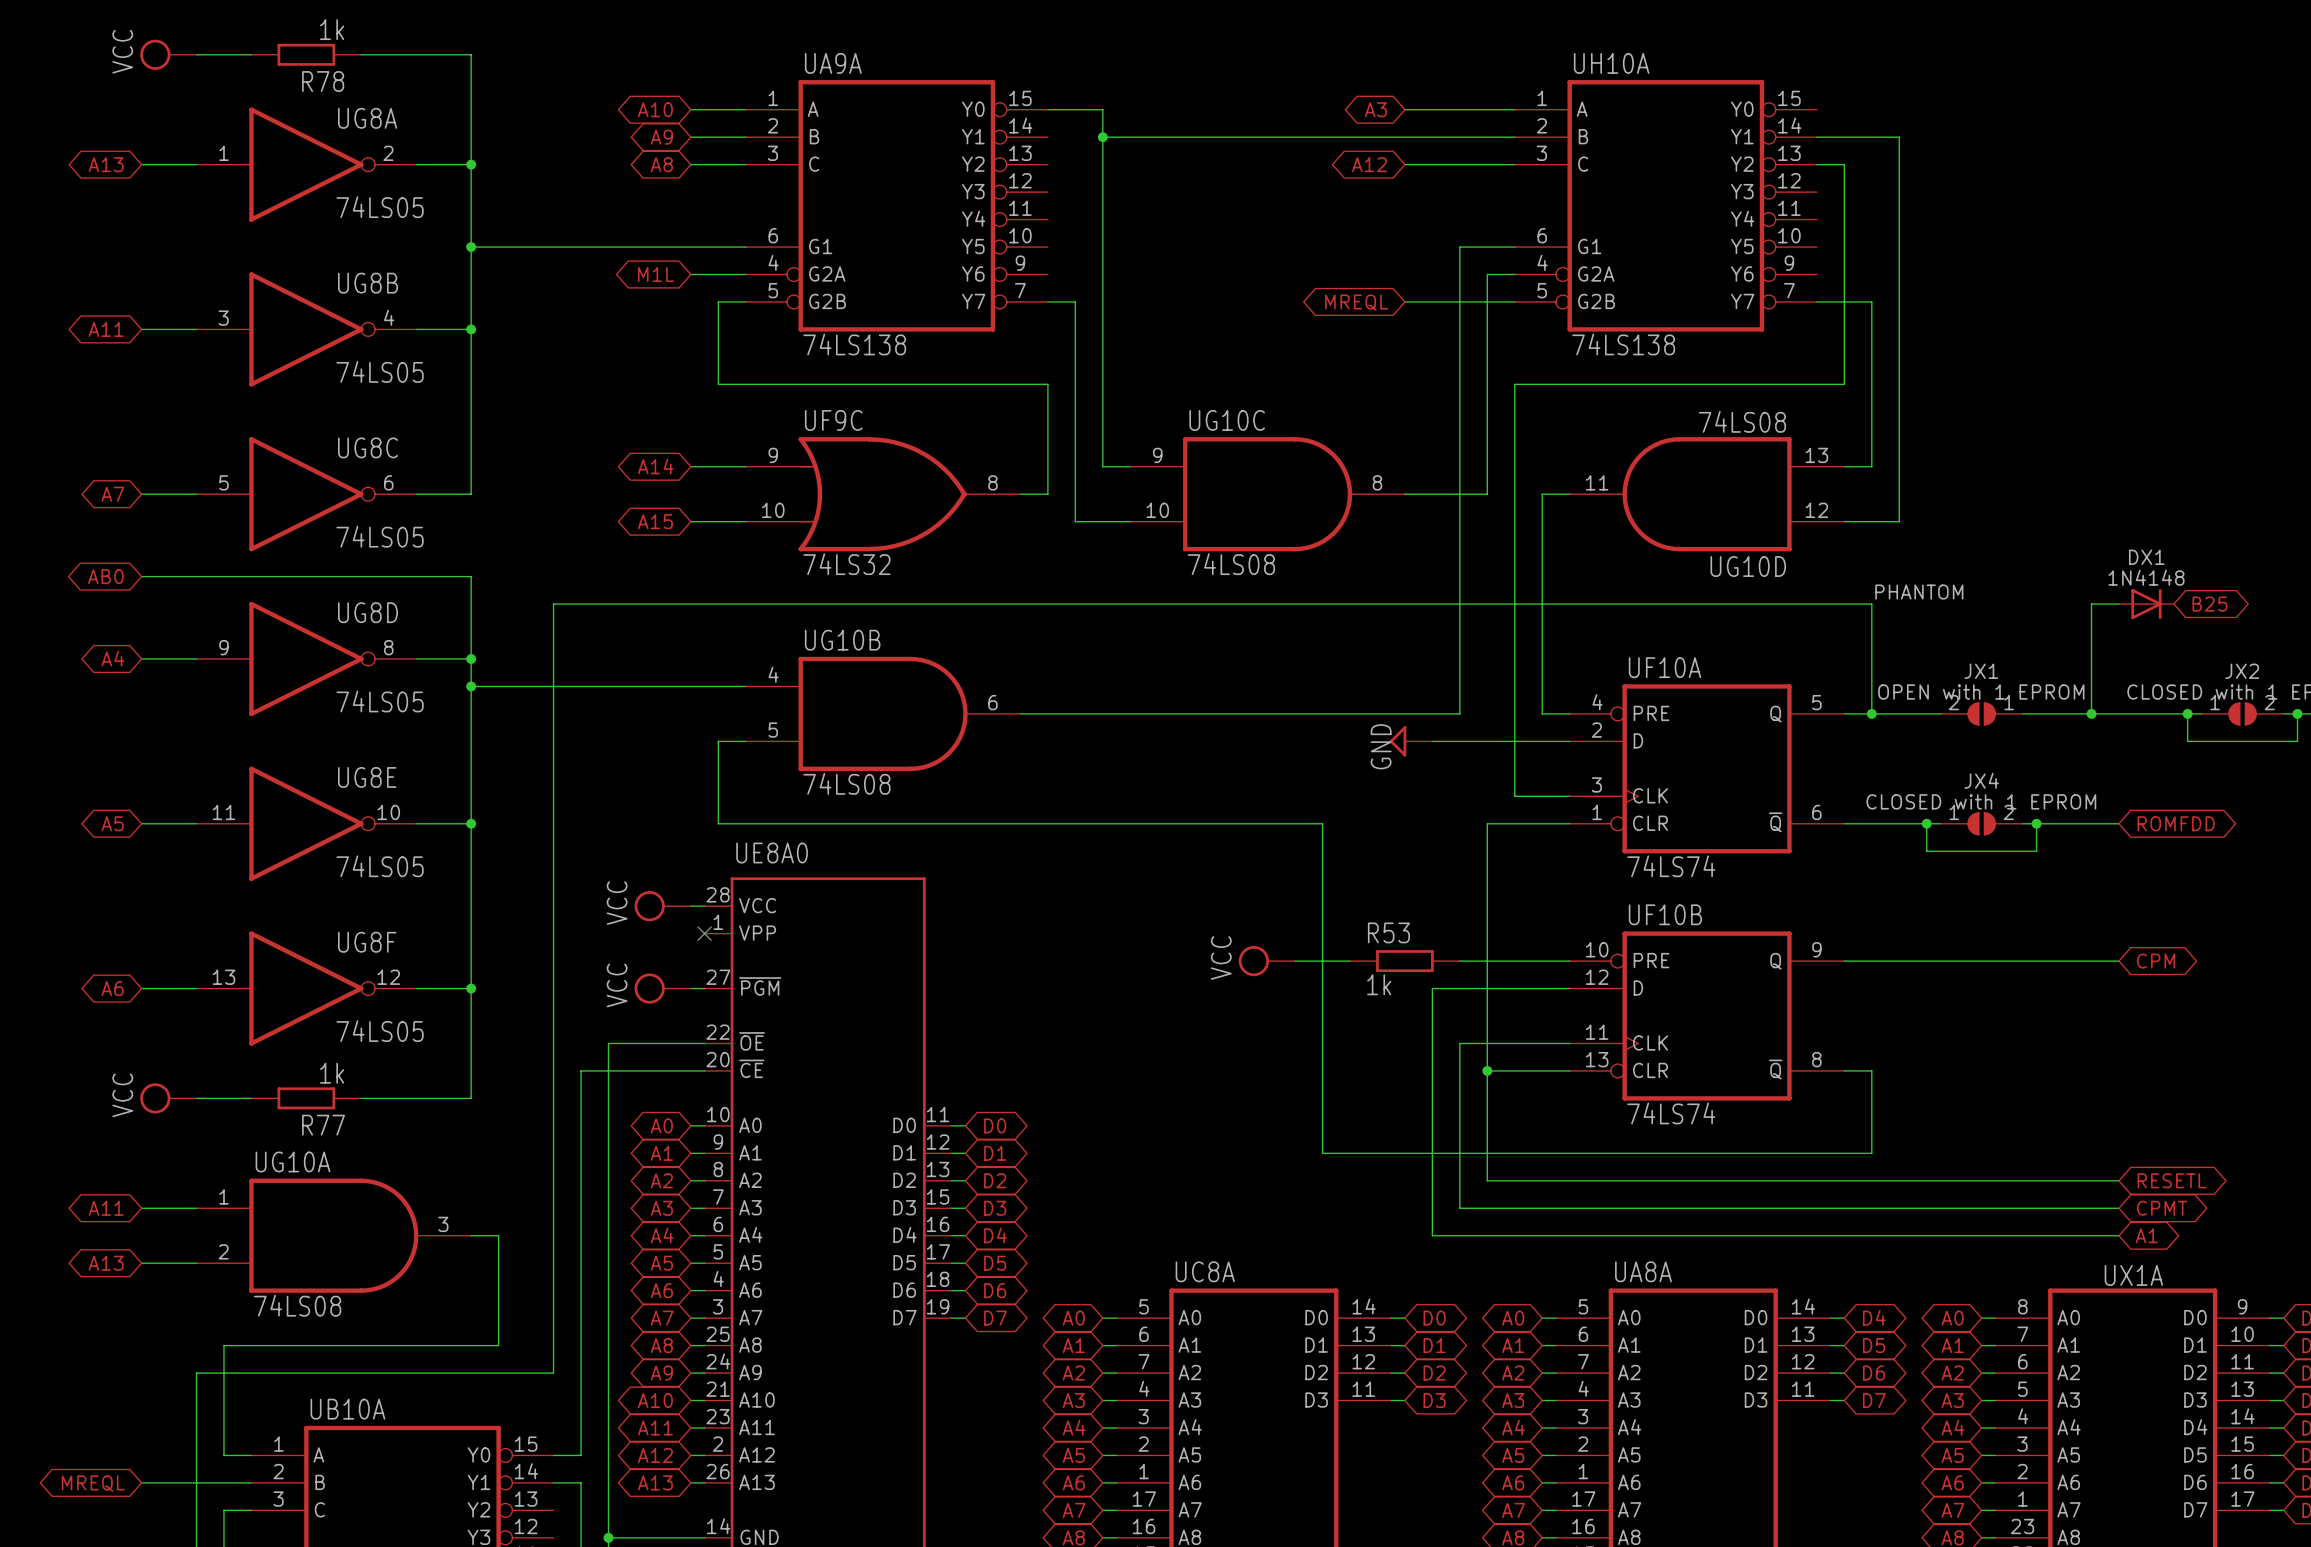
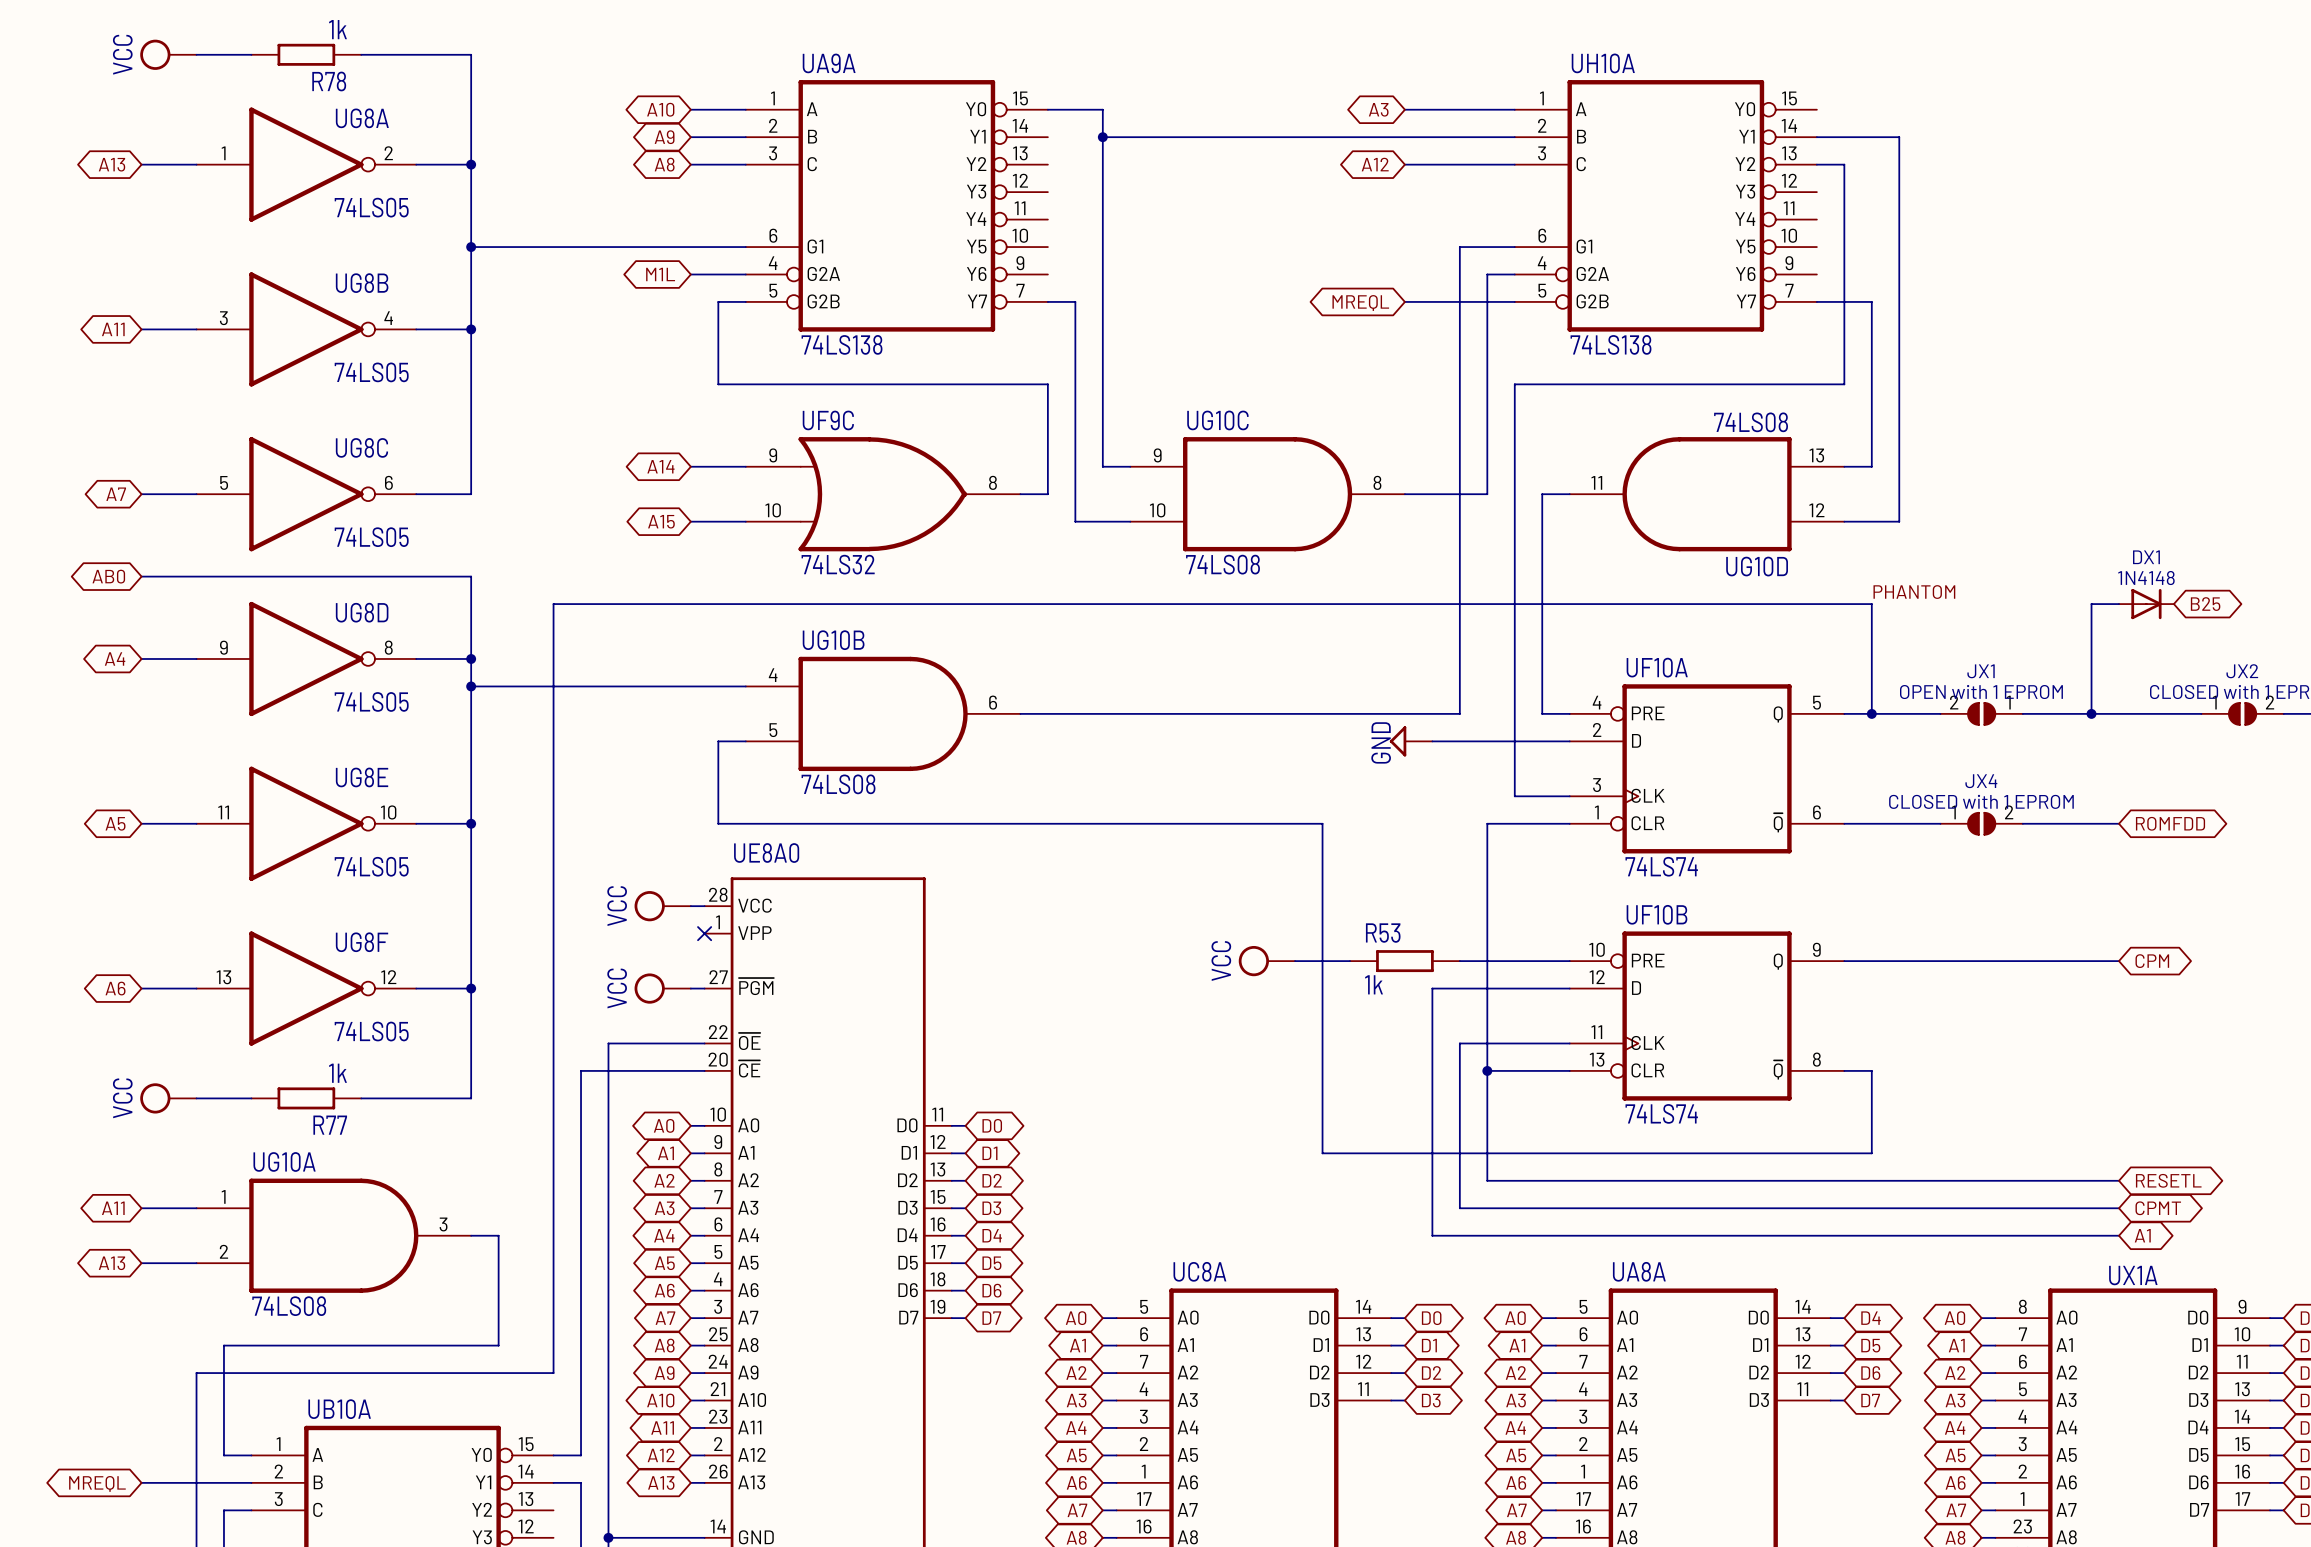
wire: (2187, 713) (2187, 741) (2297, 741) (2297, 713) -> none
junction: (2187, 713) -> none
junction: (2297, 713) -> none
wire: (1926, 823) (1926, 851) (2036, 851) (2036, 823) -> none
junction: (1926, 823) -> none
junction: (2036, 823) -> none

